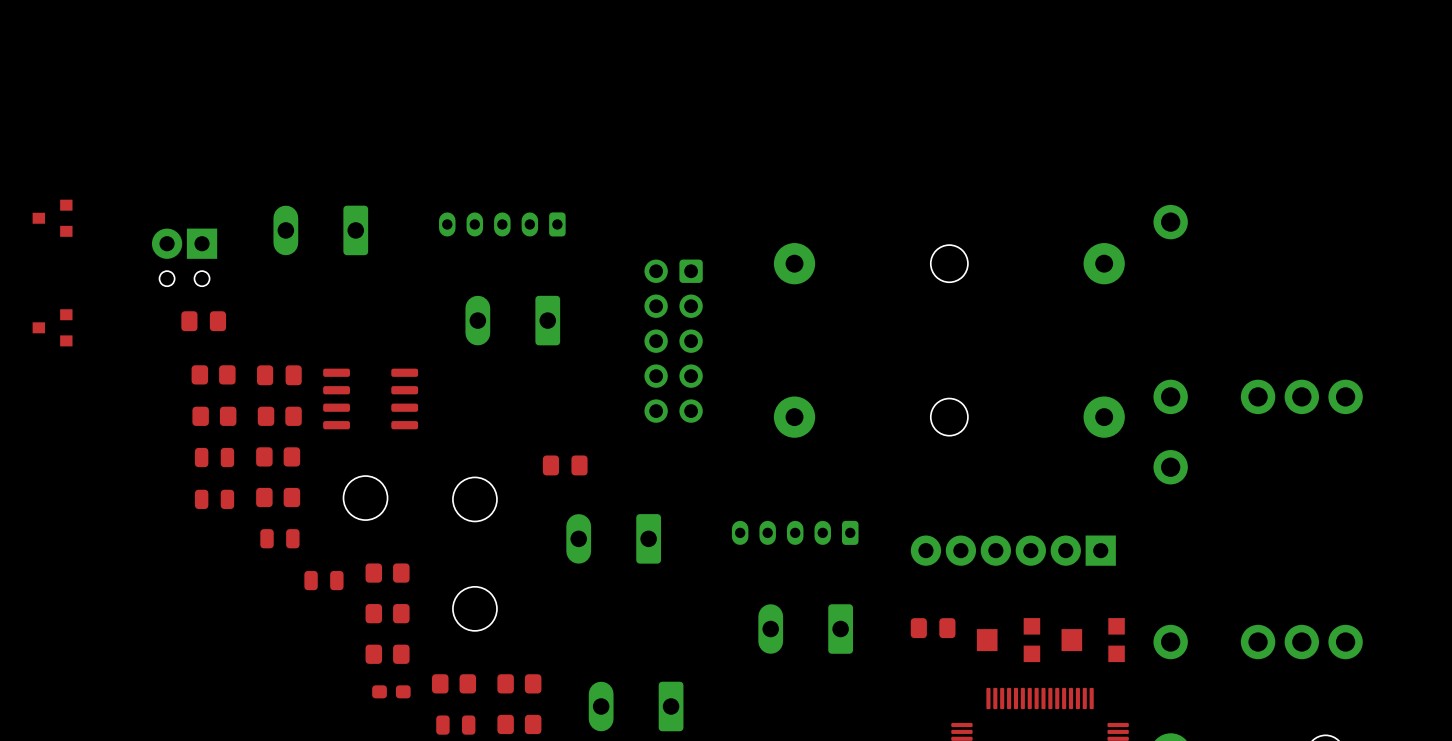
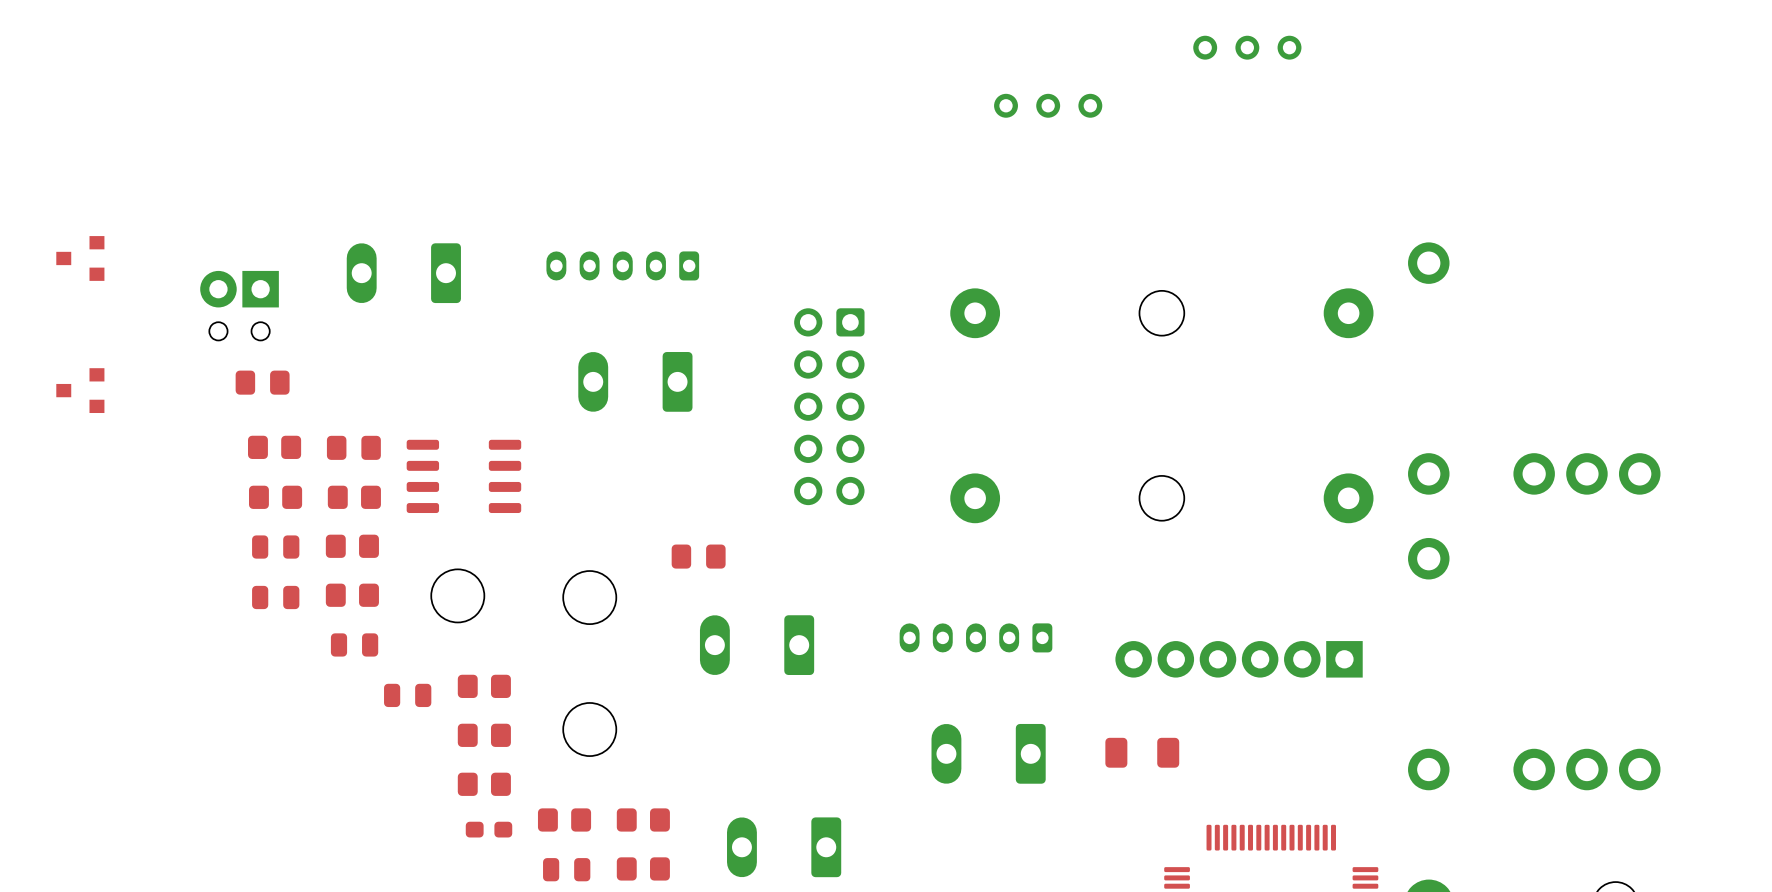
part: none -> (1247, 47)
part: none -> (1048, 105)
part footprint: [910, 618, 956, 639] -> [1105, 737, 1180, 768]
part: (1008, 640) -> none
part: (1093, 640) -> none

